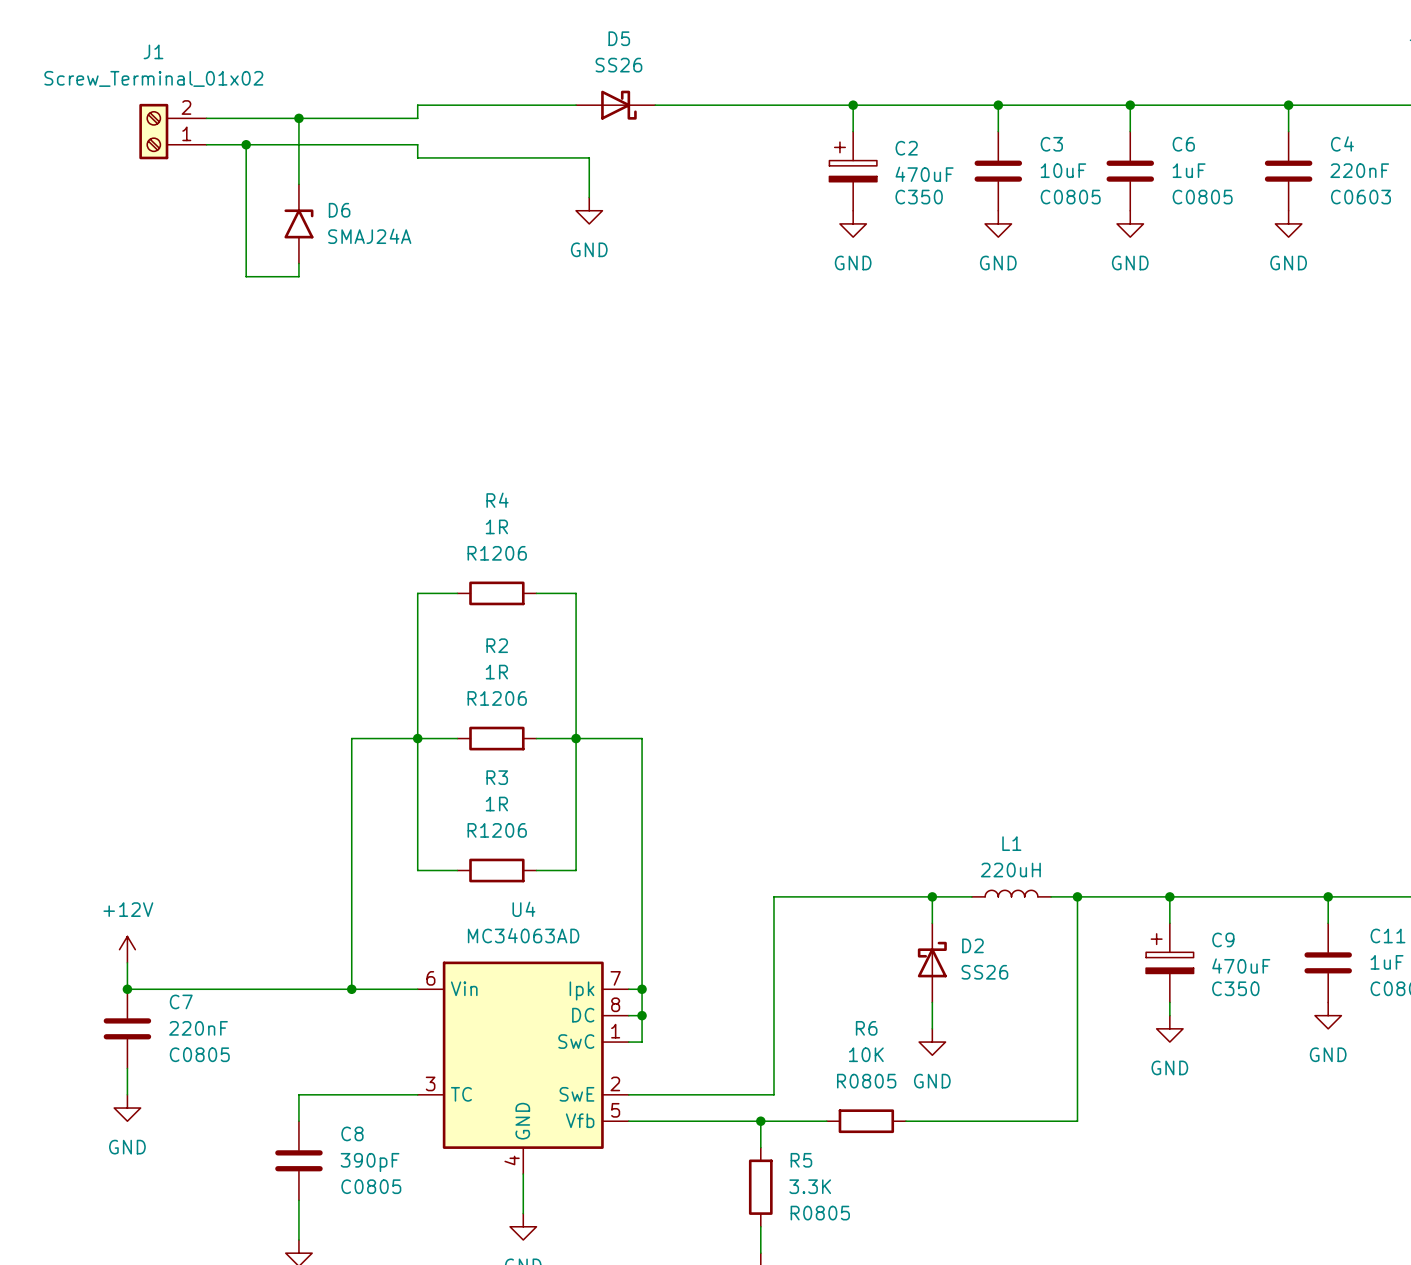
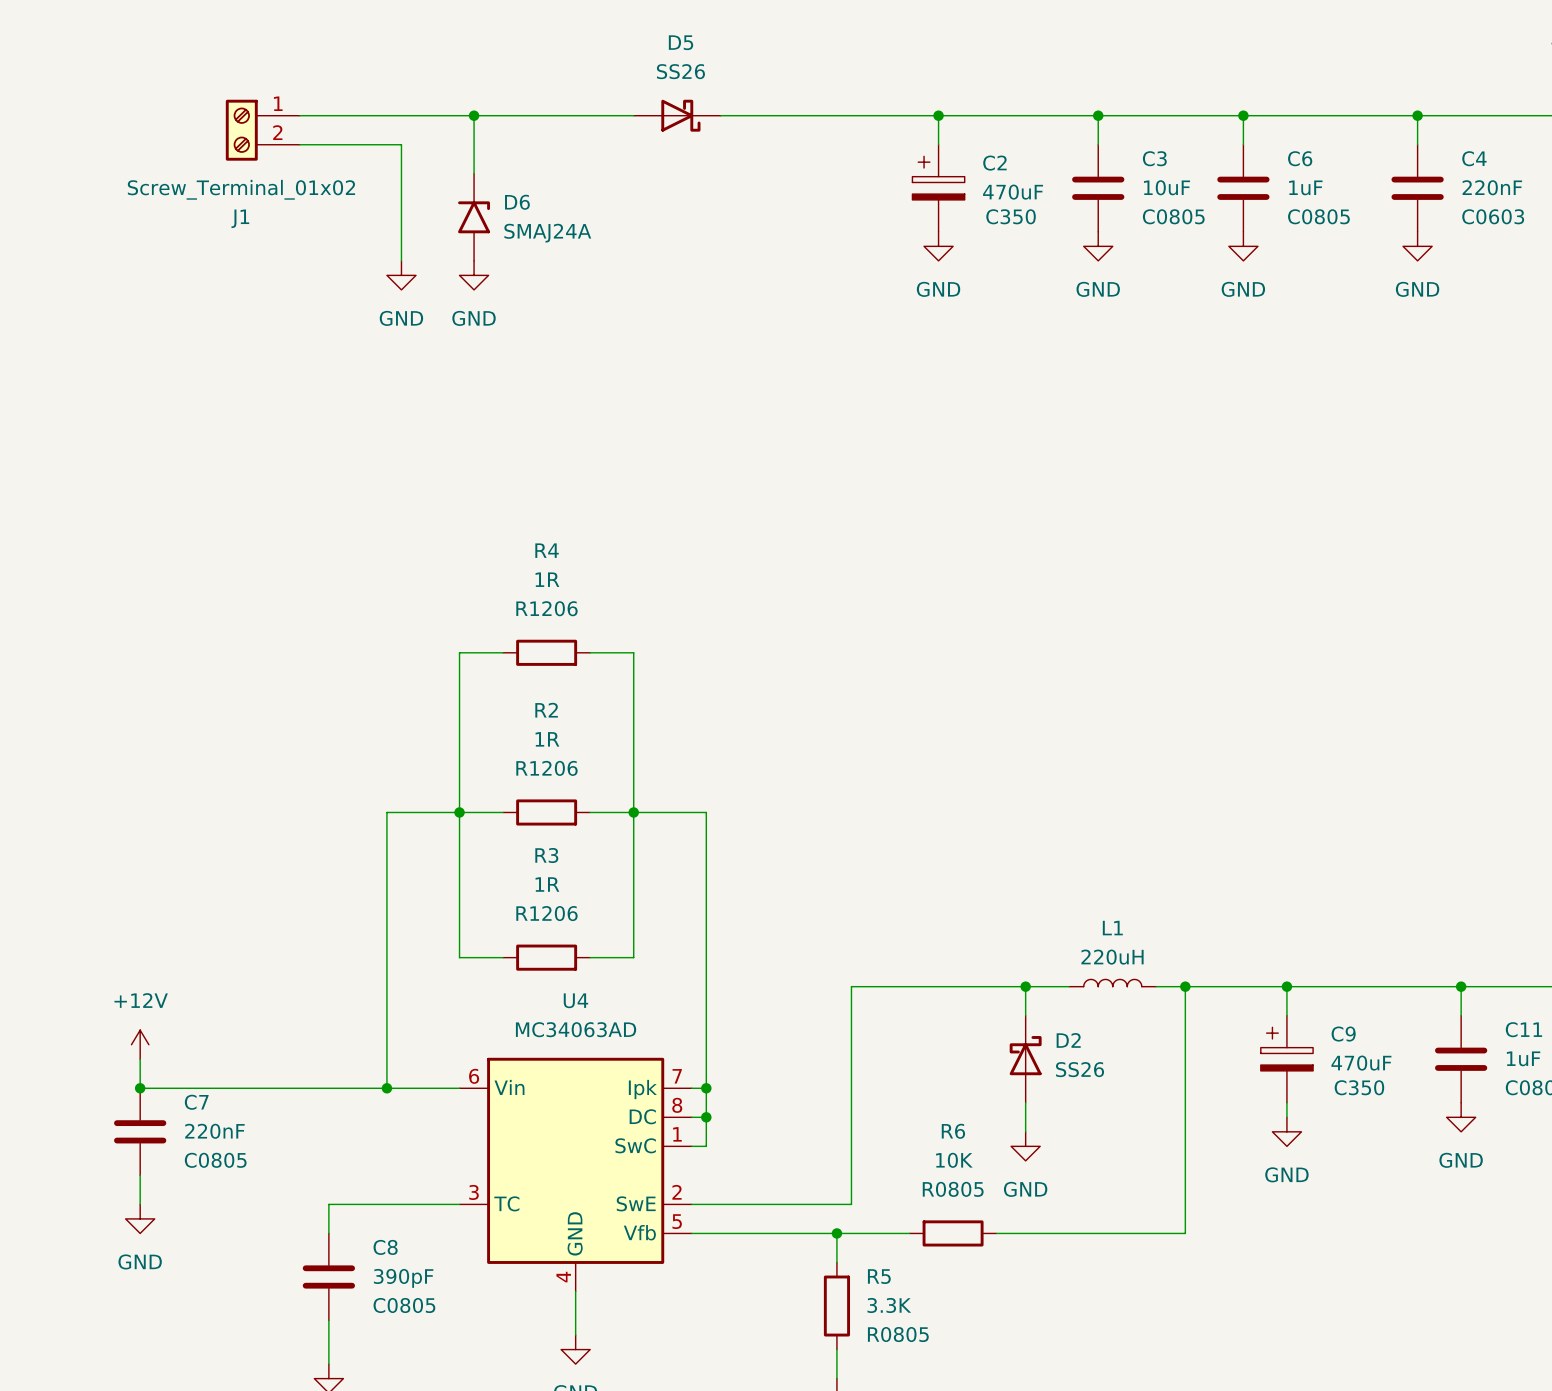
wire: (417, 105) (417, 118) (206, 118) -> (459, 115) (299, 115)
wire: none -> (474, 115) (474, 173)
junction: none -> (474, 115)
wire: (298, 118) (298, 184) -> none
junction: (298, 118) -> none
J1 flip: as is (153, 131) -> up-down (241, 130)
J1 position: (172, 131) -> (262, 130)
wire: none -> (299, 144) (401, 144) (401, 260)
wire: (206, 144) (417, 144) (417, 157) (589, 157) (589, 197) -> none
wire: (246, 144) (246, 276) (298, 276) (298, 263) -> none
junction: (246, 144) -> none
power symbol: GND (589, 210) -> none
D6 position: (298, 223) -> (474, 217)
power symbol: none -> GND (401, 275)
power symbol: none -> GND (474, 275)

